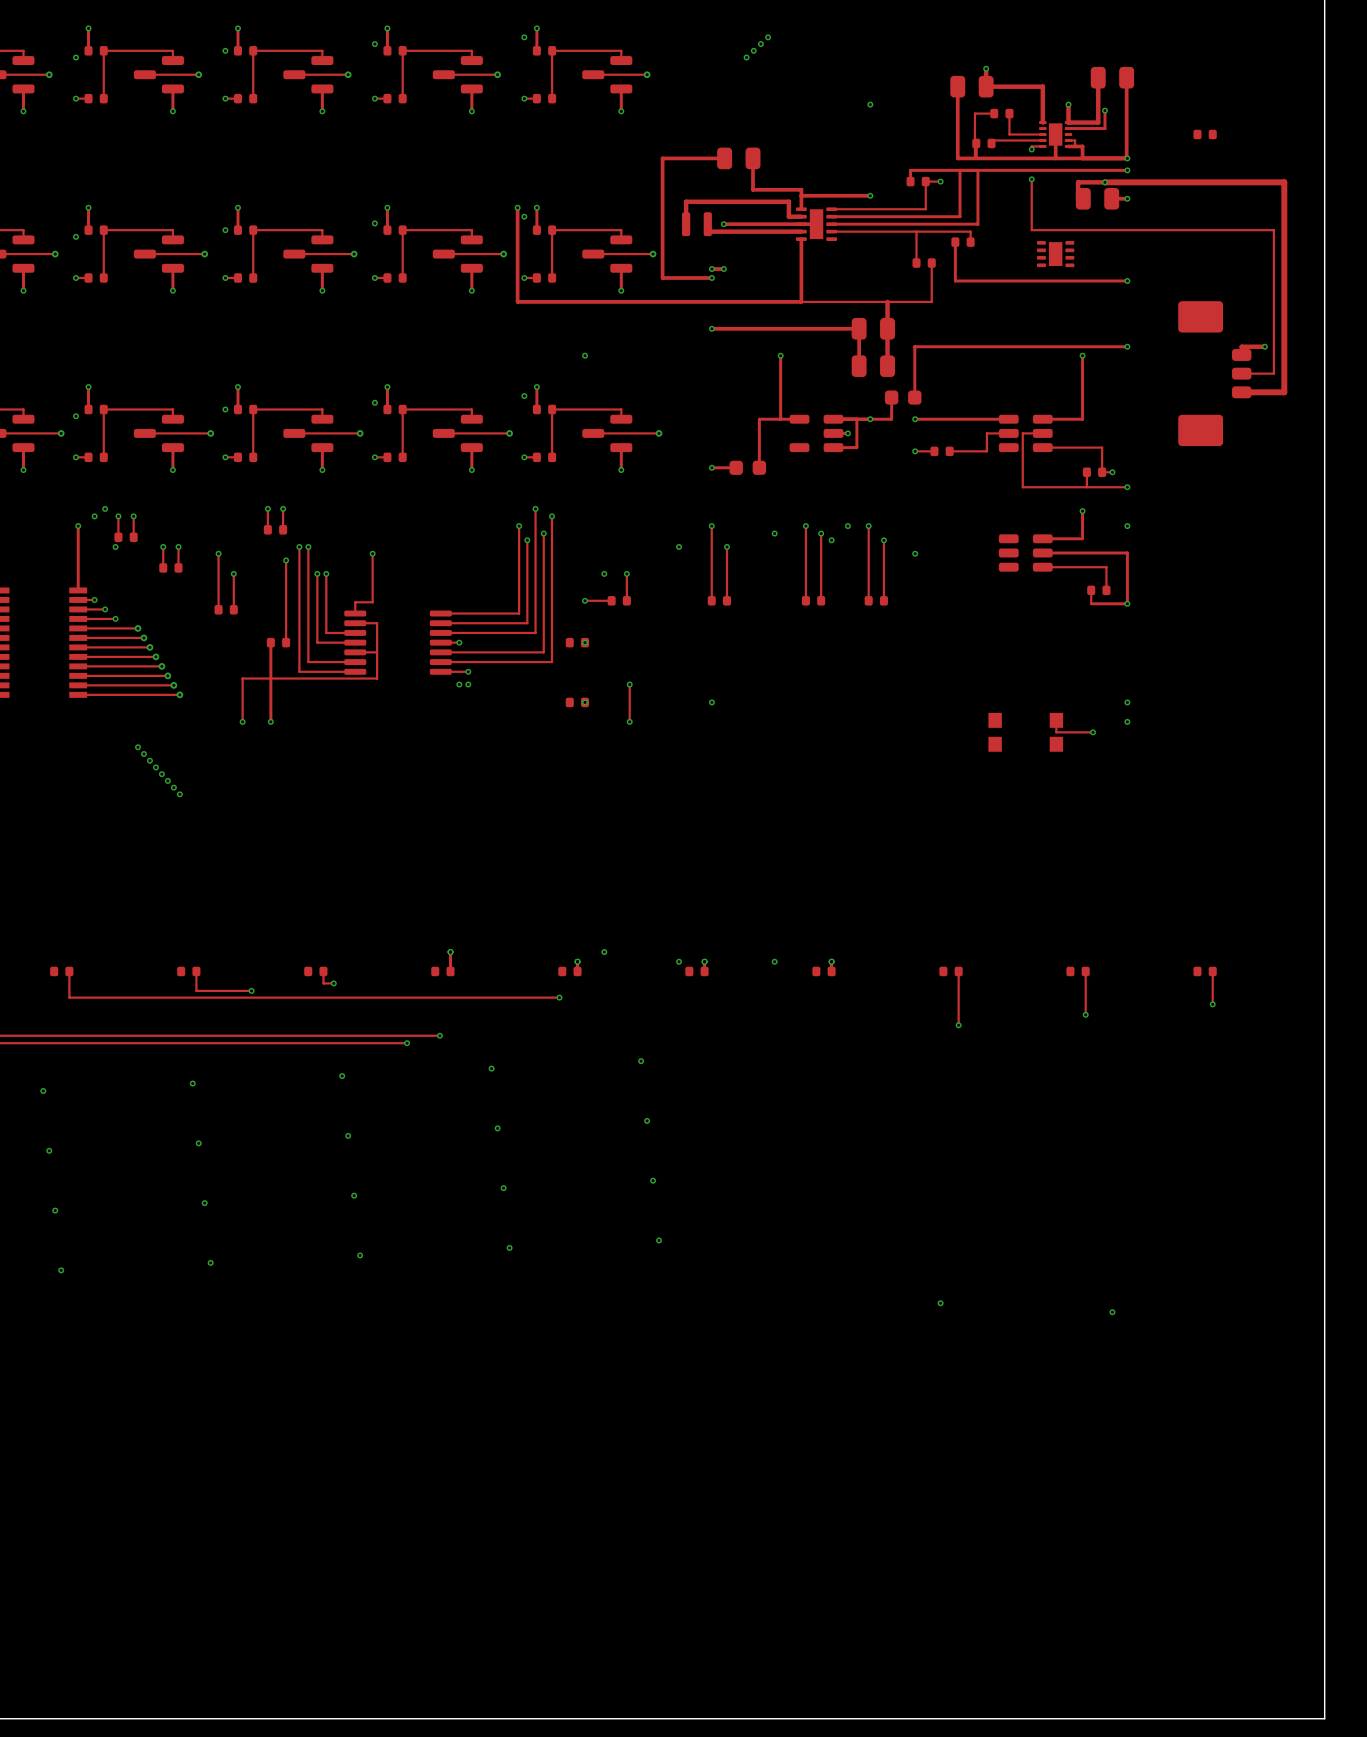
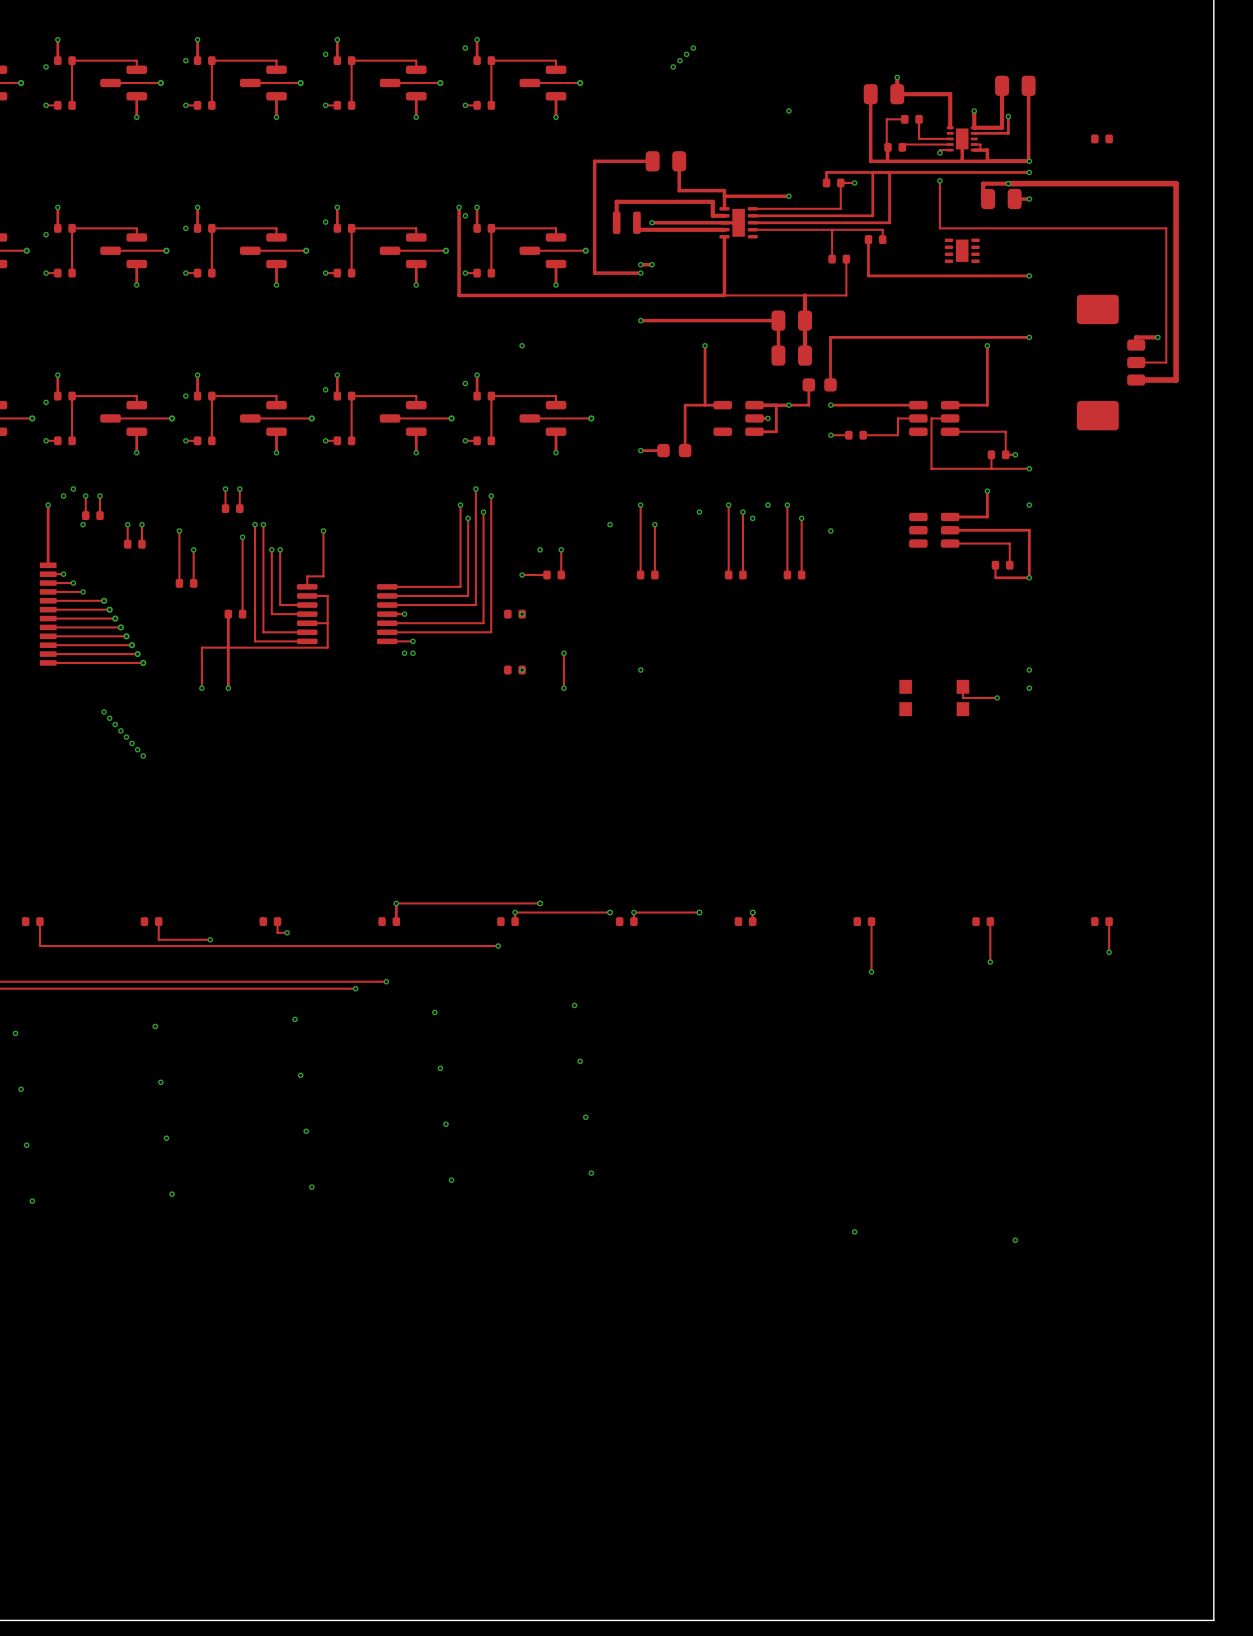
top track: none -> (540, 903) (396, 903)
top track: none -> (610, 912) (515, 912)
top track: none -> (699, 912) (633, 912)

